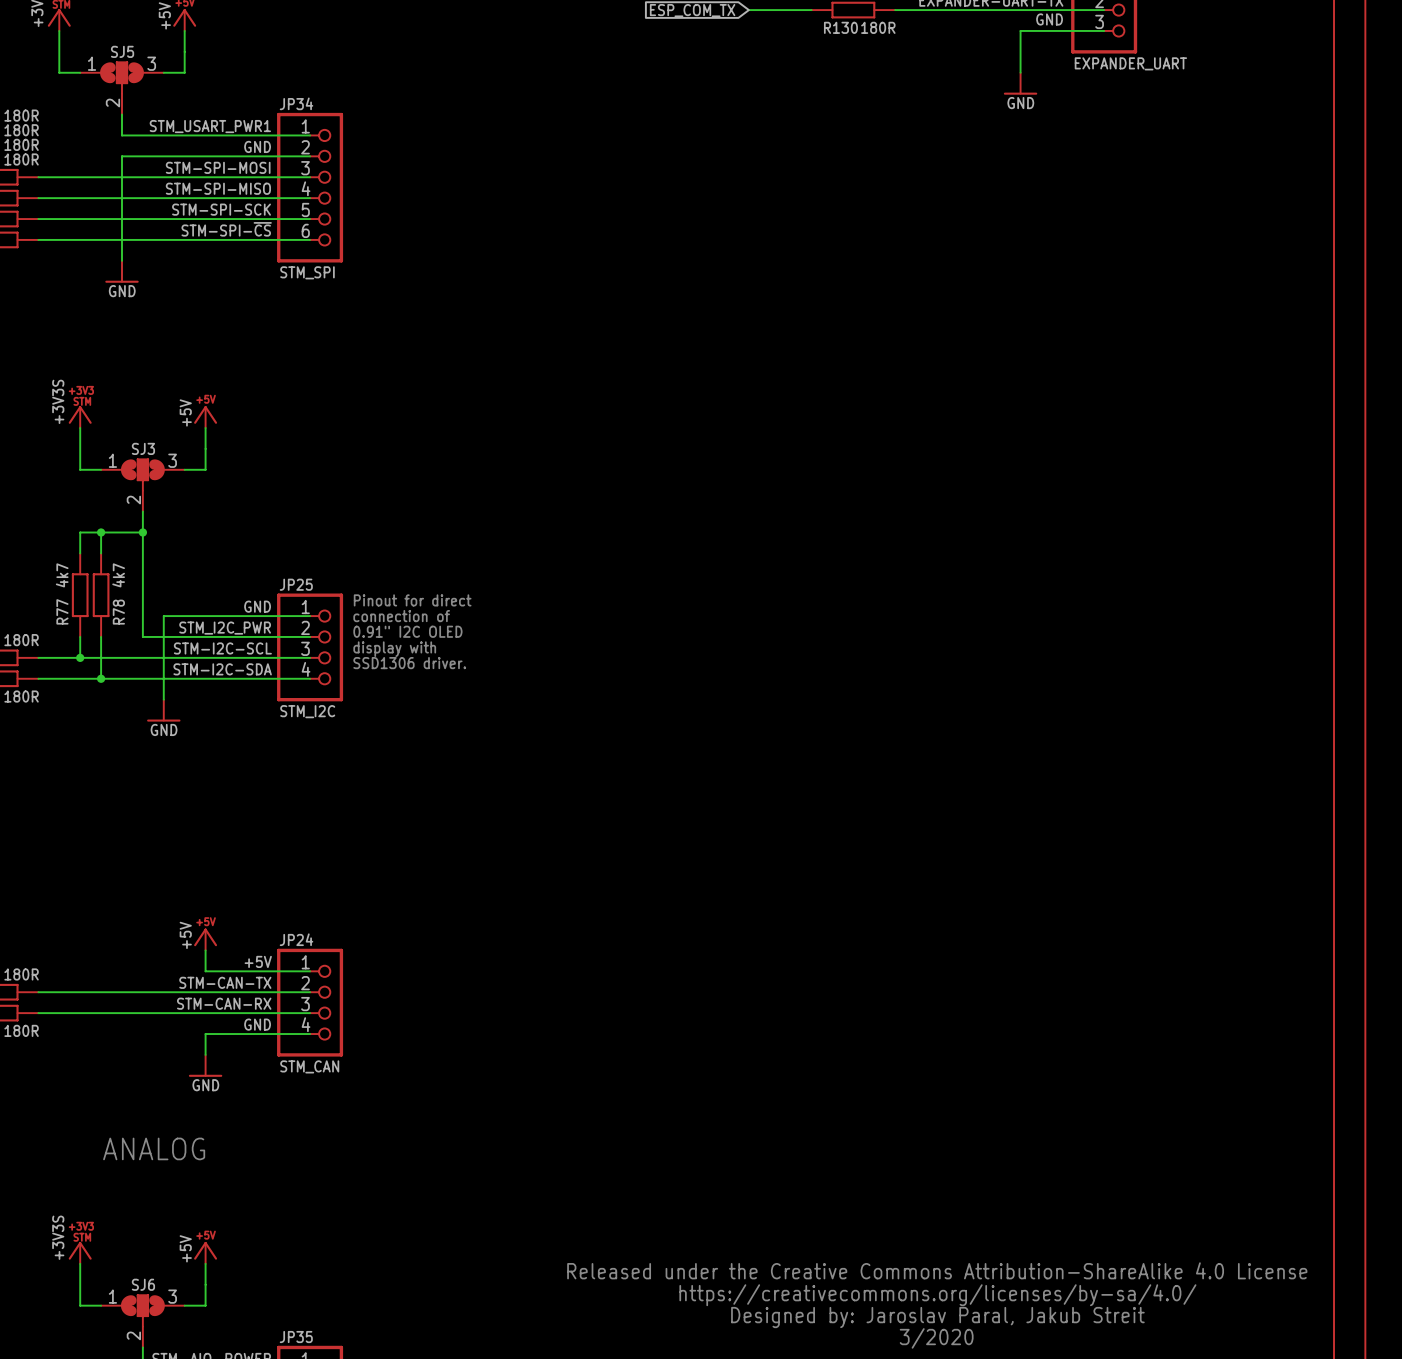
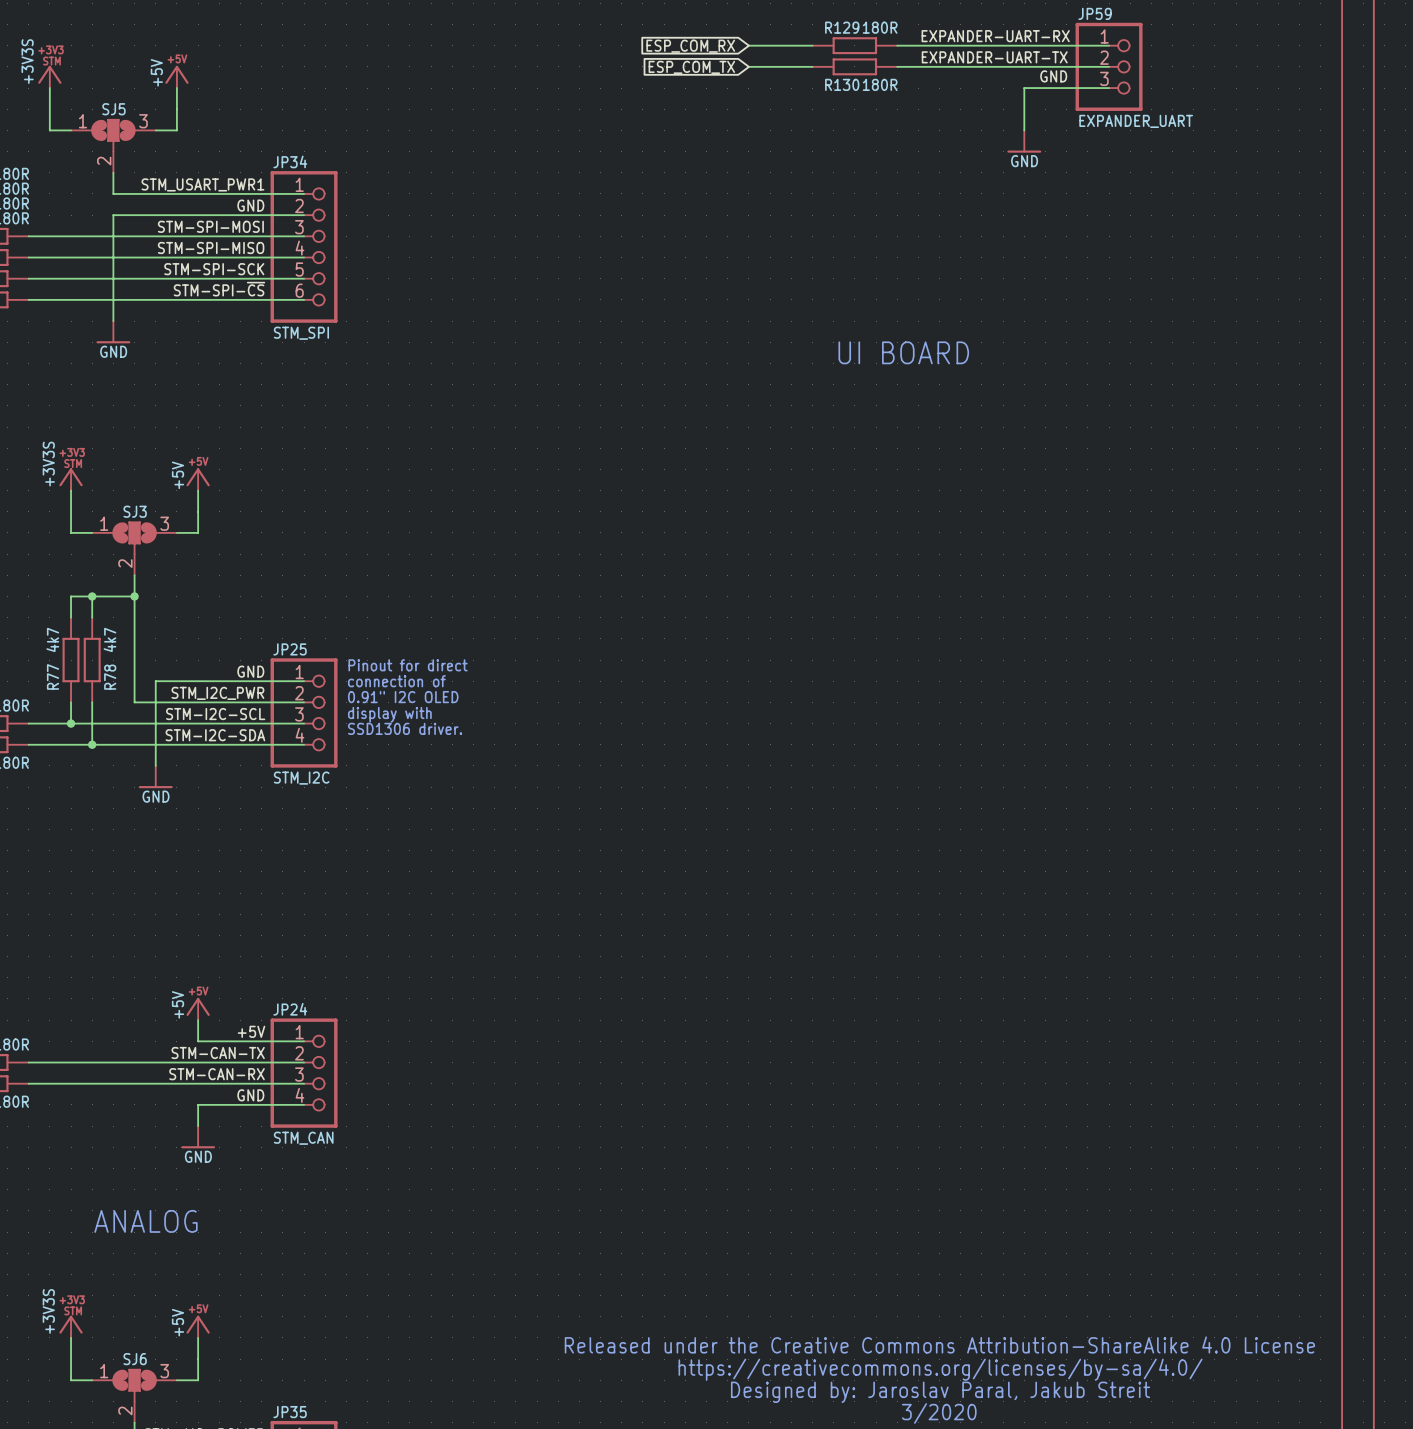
text: none -> UI BOARD (903, 352)

